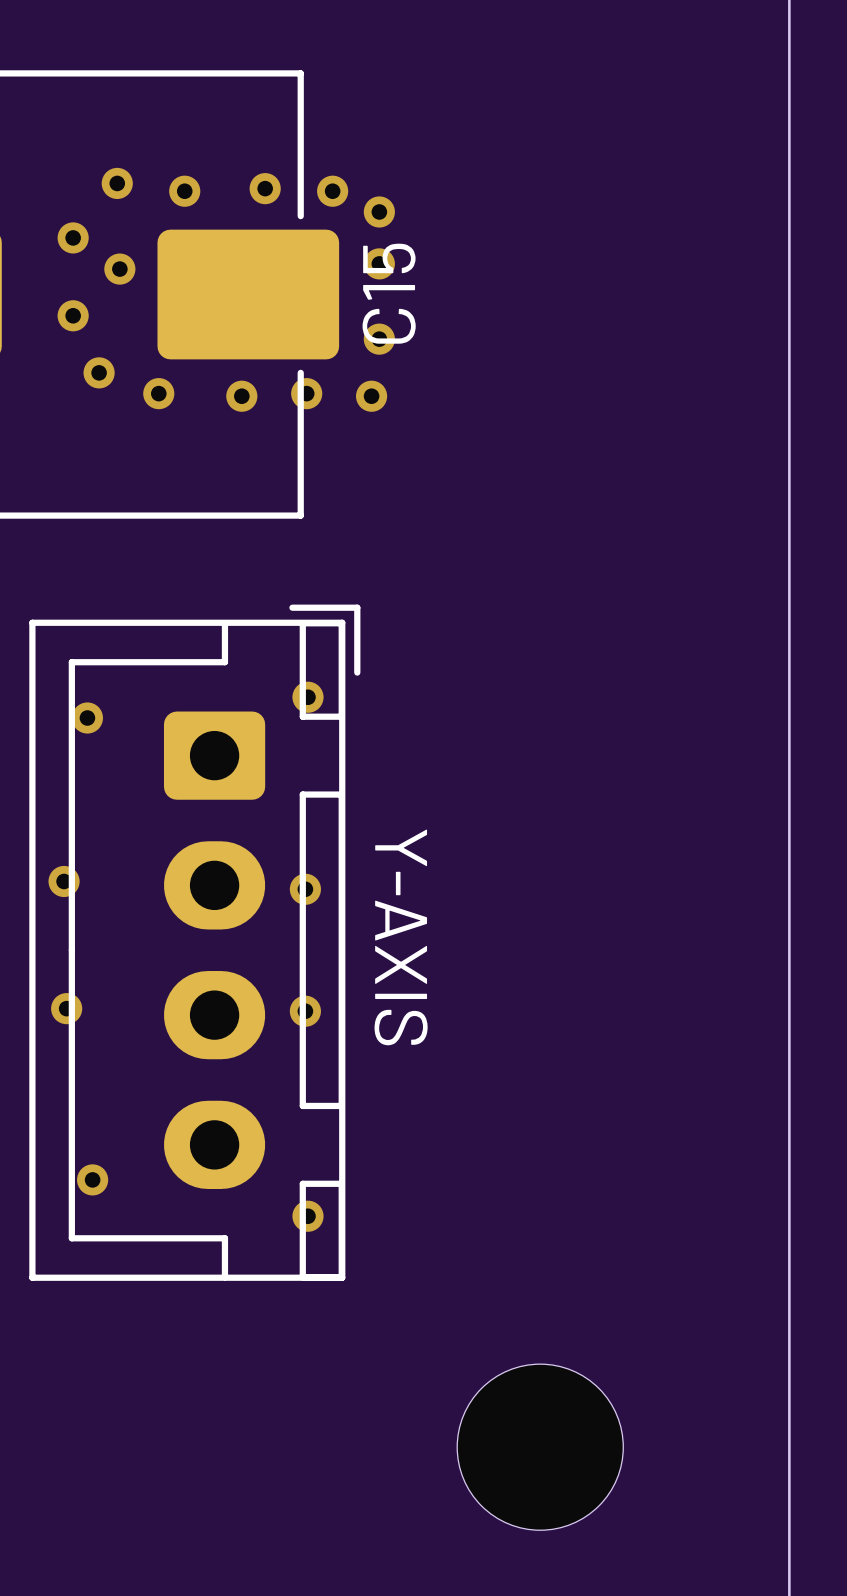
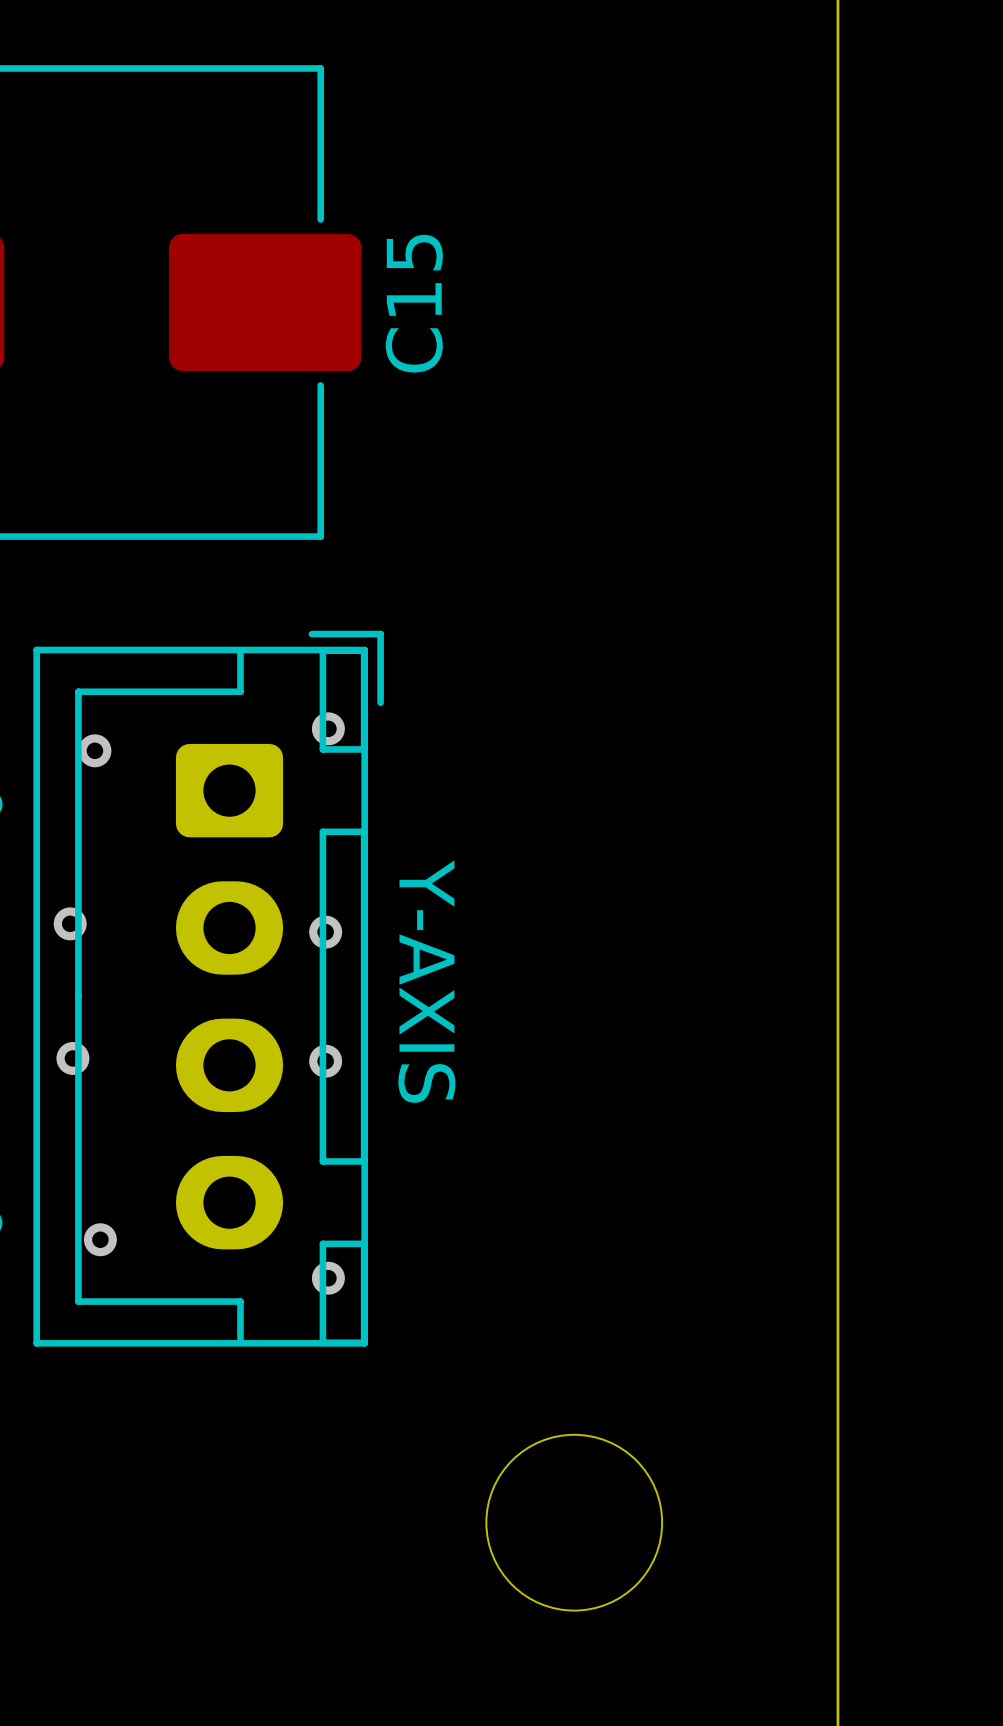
via: (117, 183) -> none
via: (265, 188) -> none
via: (184, 191) -> none
via: (332, 191) -> none
via: (379, 211) -> none
via: (73, 237) -> none
via: (379, 263) -> none
via: (119, 269) -> none
via: (73, 315) -> none
via: (379, 339) -> none
via: (99, 372) -> none
via: (158, 393) -> none
via: (306, 393) -> none
via: (241, 396) -> none
via: (371, 396) -> none

